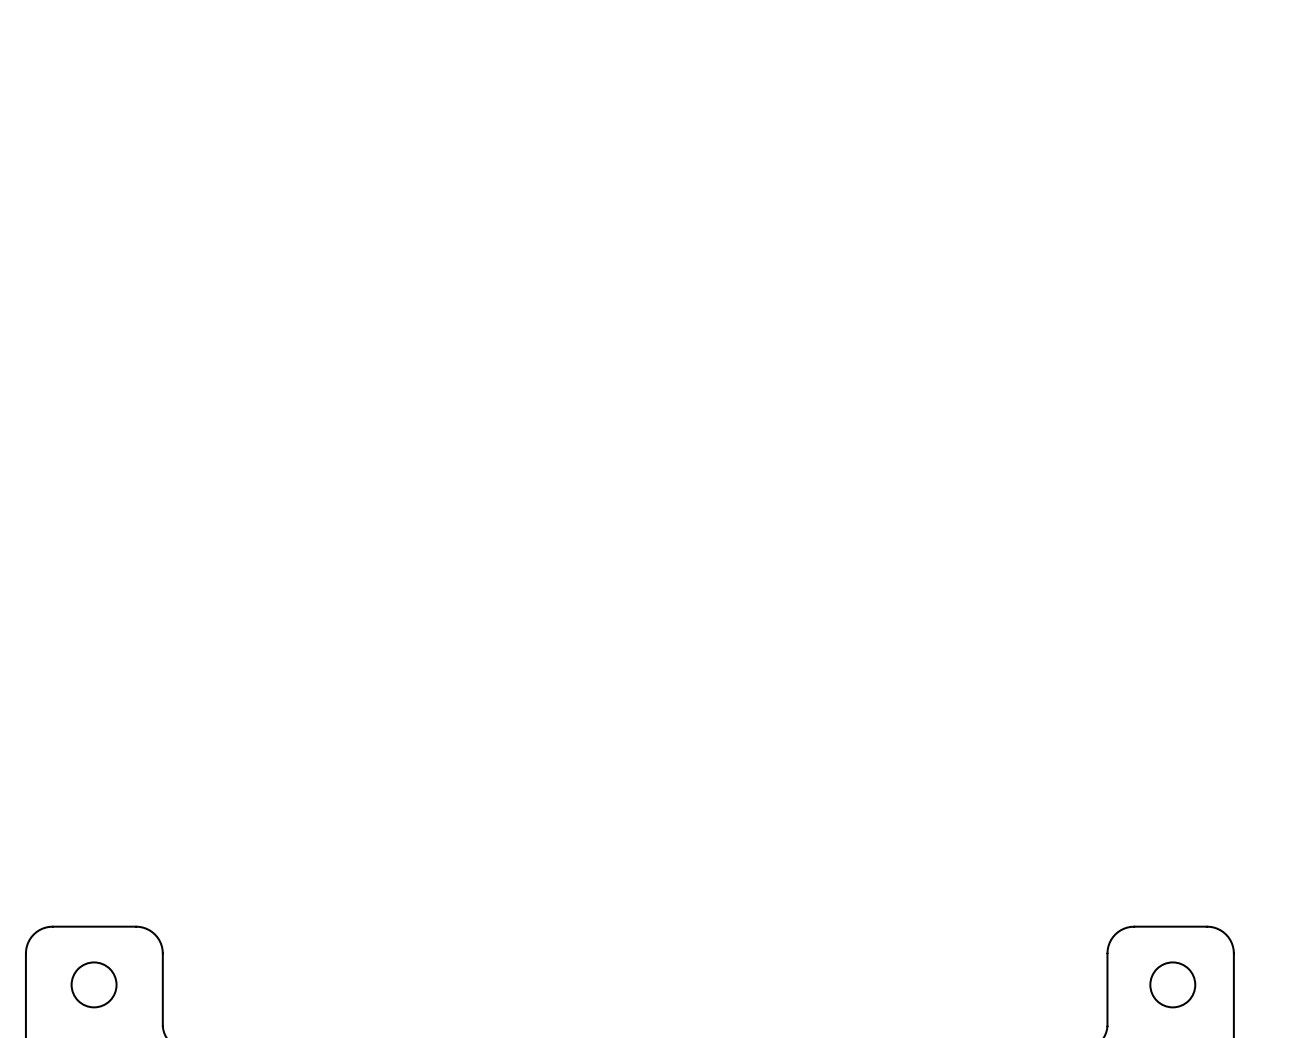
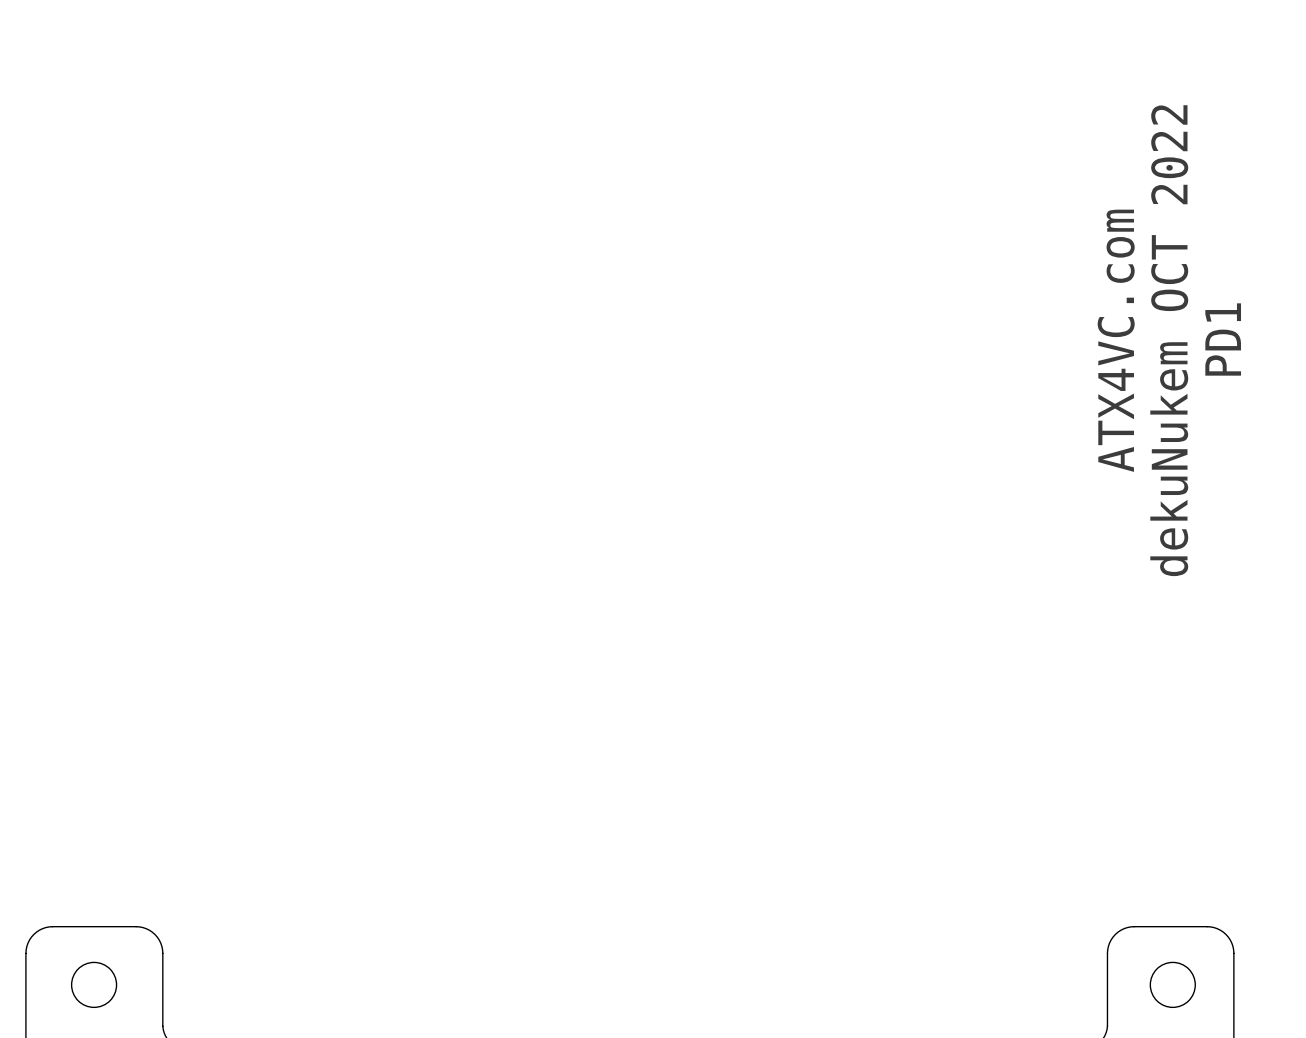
text: none -> PD1 (1223, 339)
text: none -> ATX4VC.com (1116, 340)
text: none -> dekuNukem OCT 2022 (1169, 340)

